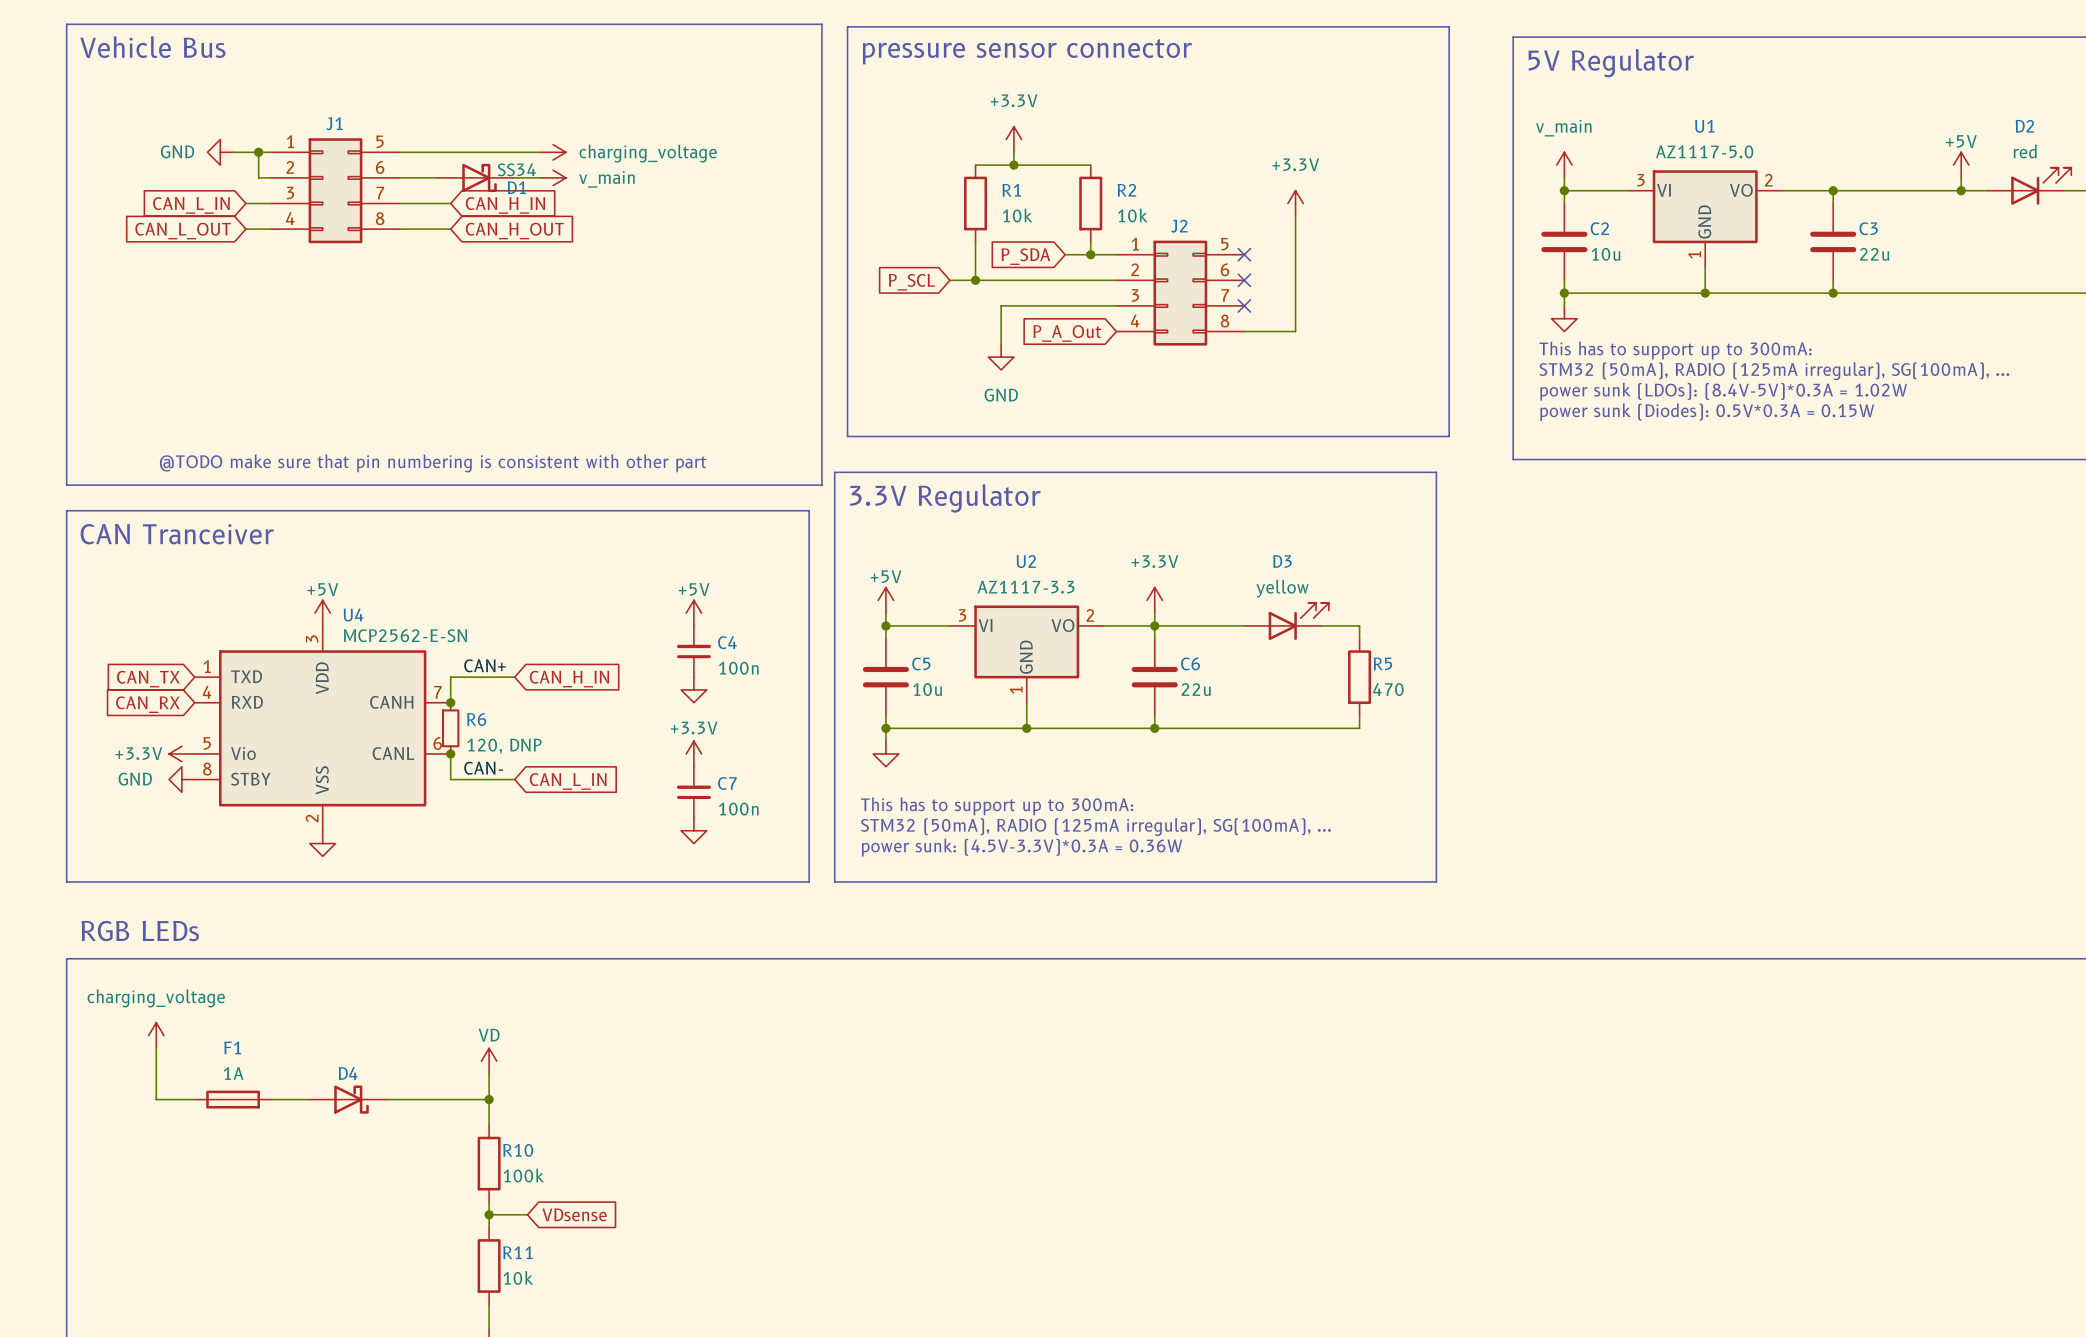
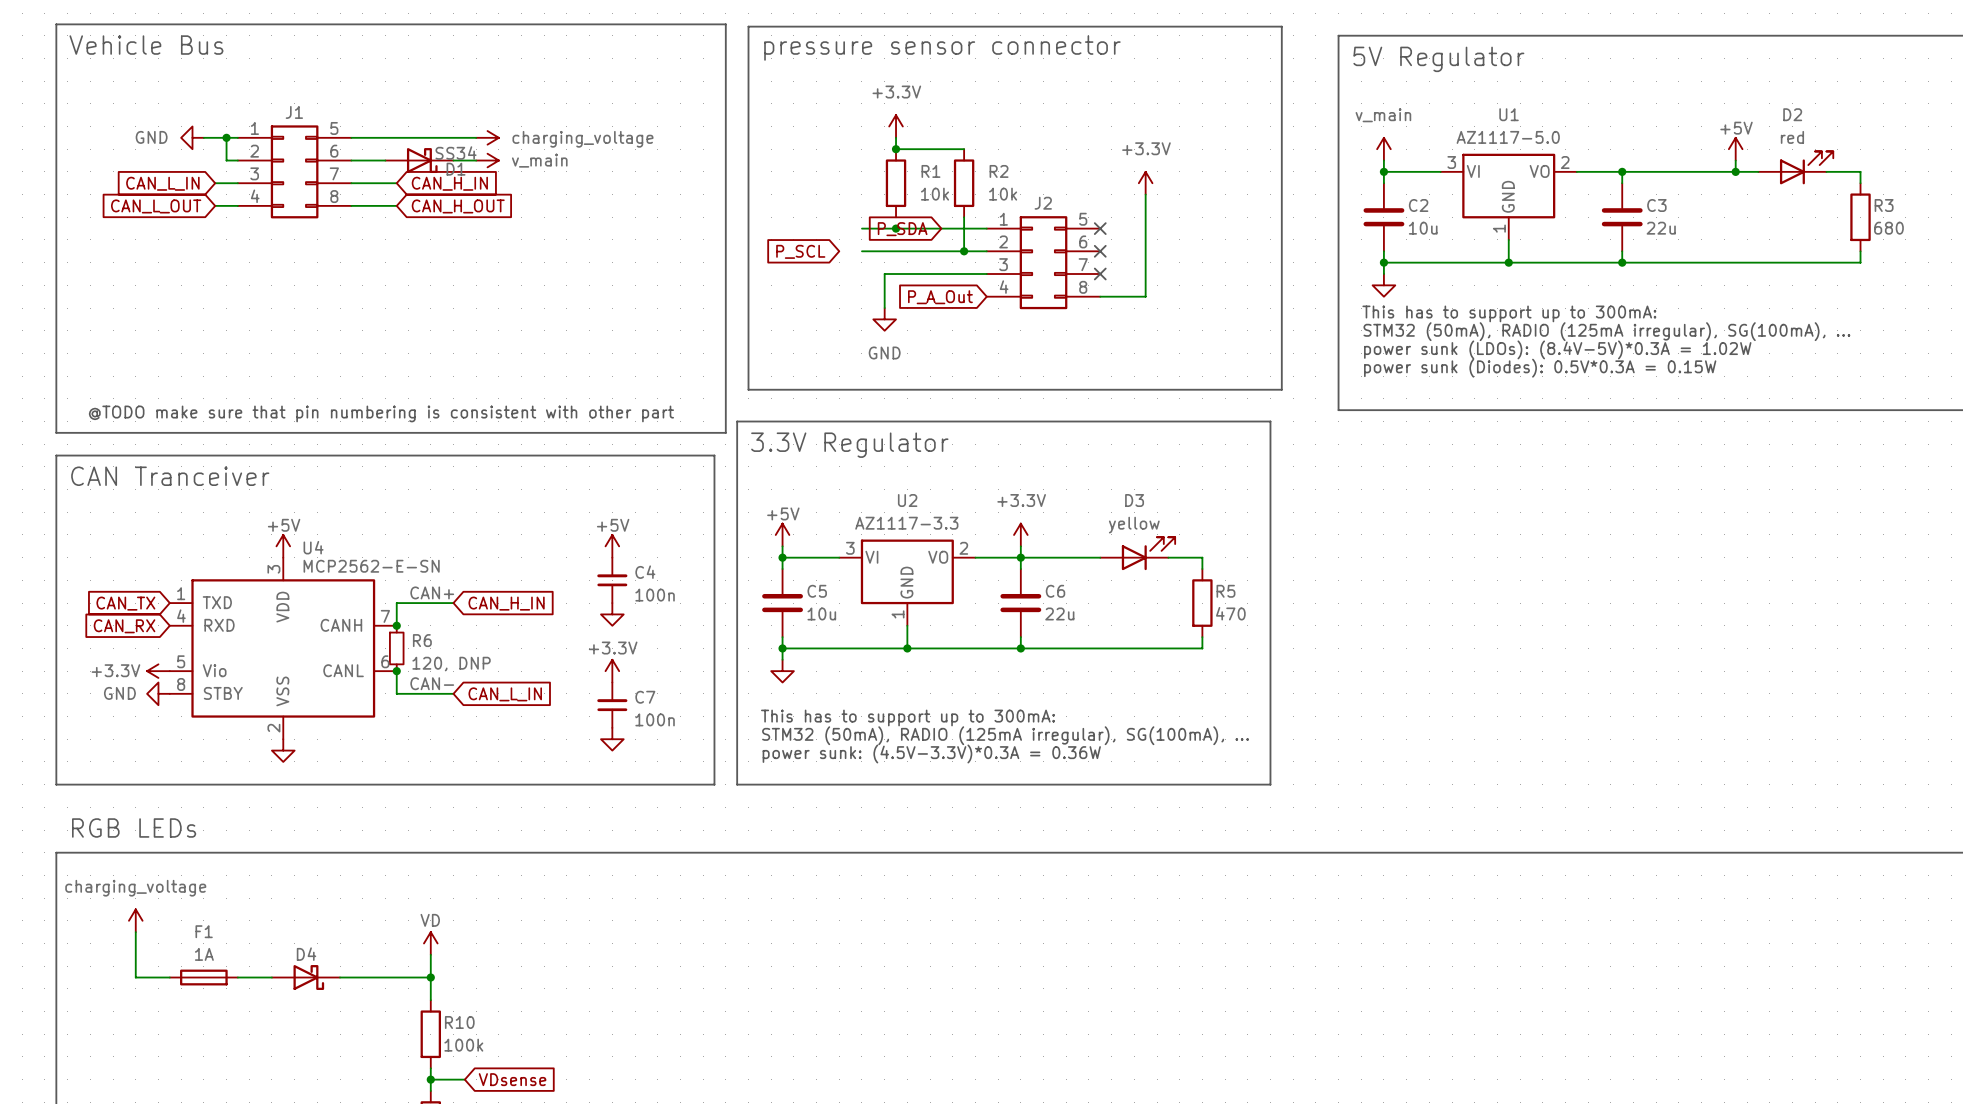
wire: (975, 165) (1013, 165) -> none
R1 position: (975, 203) -> (896, 183)
wire: (975, 241) (975, 280) (949, 280) -> none
wire: none -> (861, 228) (941, 228)
junction: none -> (896, 228)
wire: none -> (964, 228) (964, 251)
junction position: (1090, 254) -> (964, 251)
junction: (975, 280) -> none

